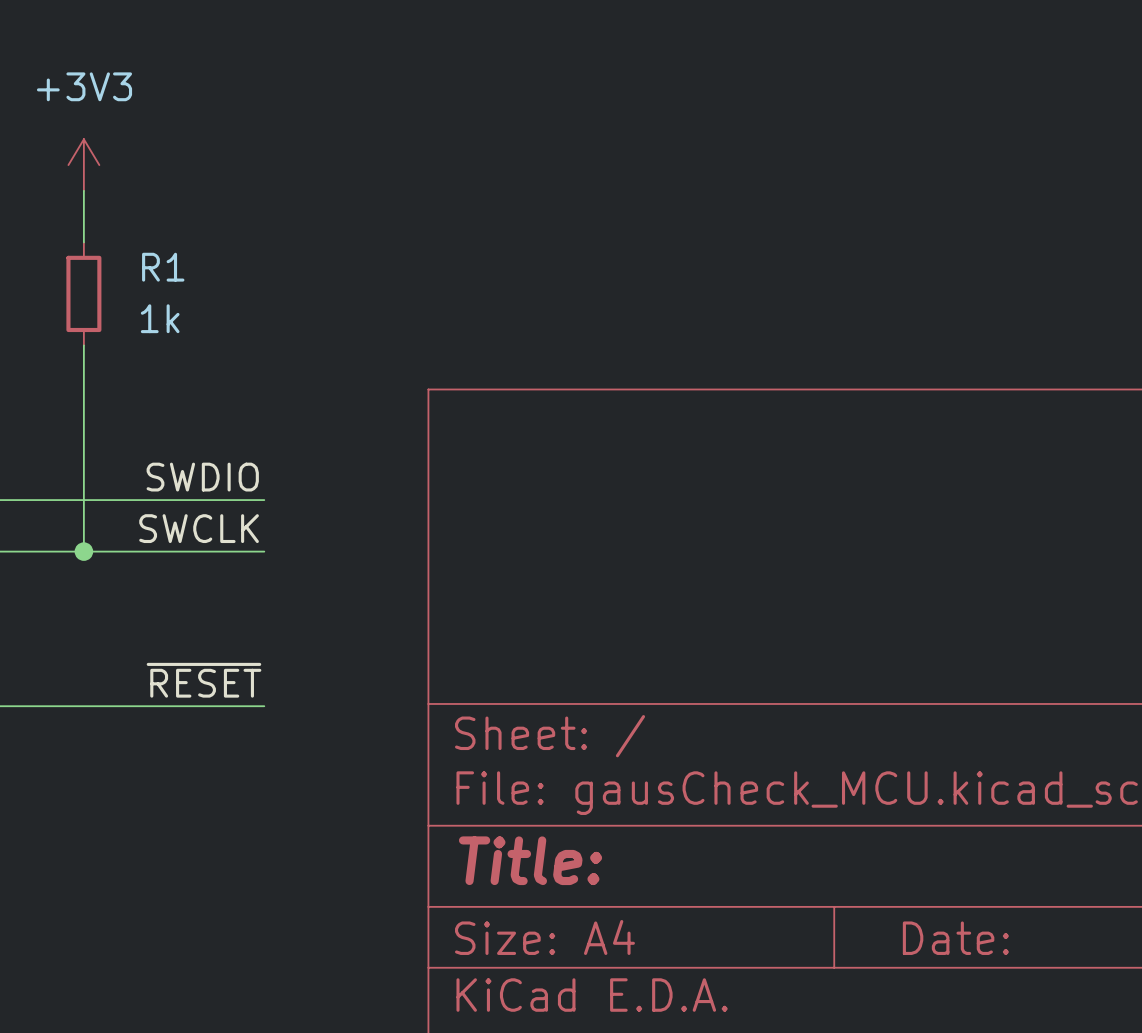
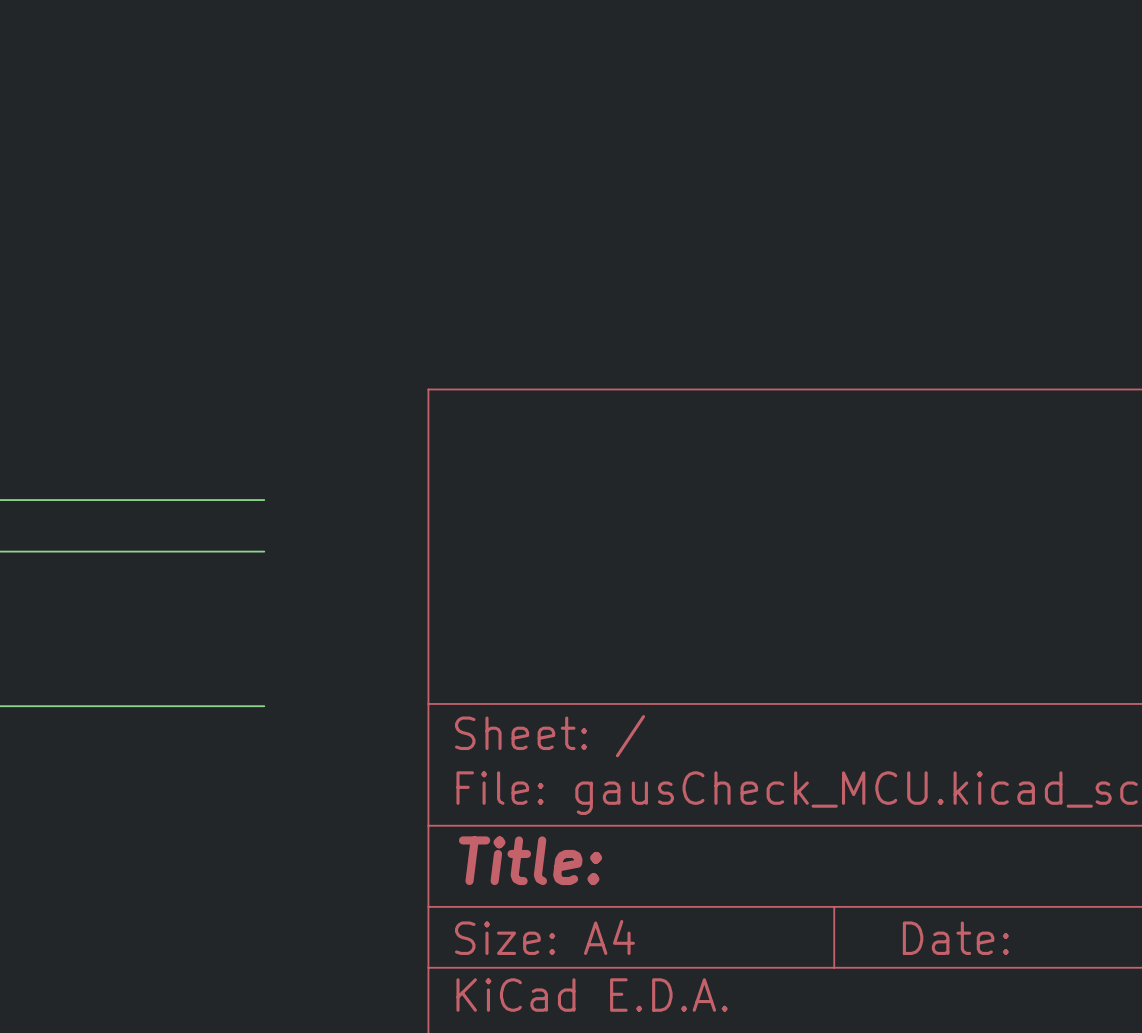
power symbol: +3V3 (83, 165) -> none
wire: (83, 190) (83, 242) -> none
R1: 1k (83, 293) -> none
wire: (83, 345) (83, 551) -> none
label: SWDIO (202, 477) -> none
label: SWCLK (199, 528) -> none
junction: (83, 551) -> none
label: ~{RESET} (204, 680) -> none

